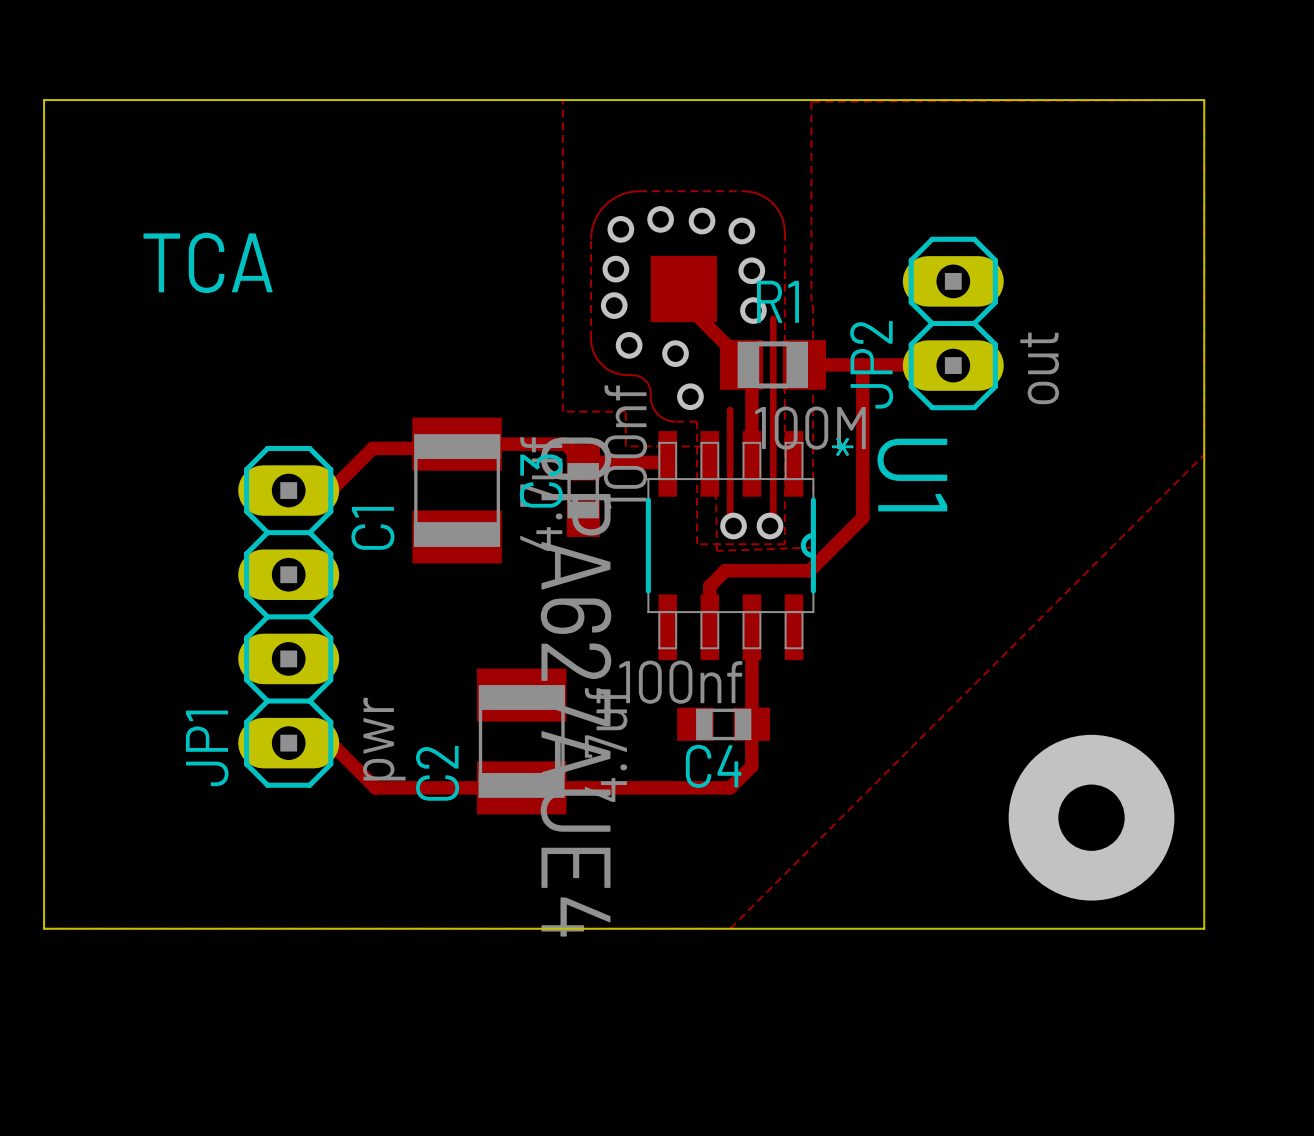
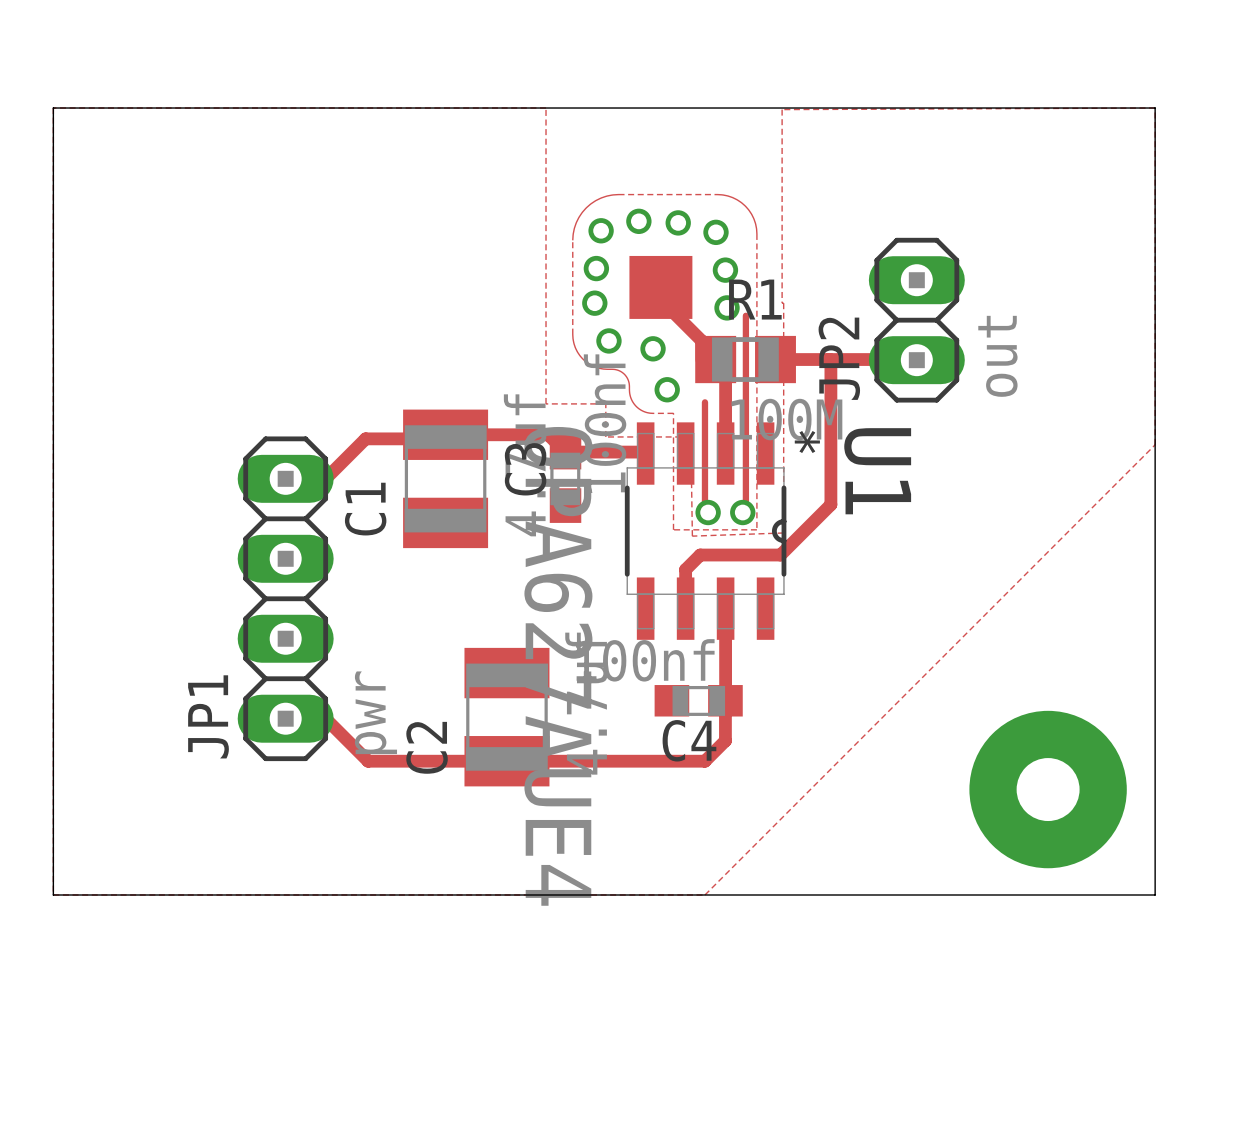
text: TCA (208, 262) -> none

